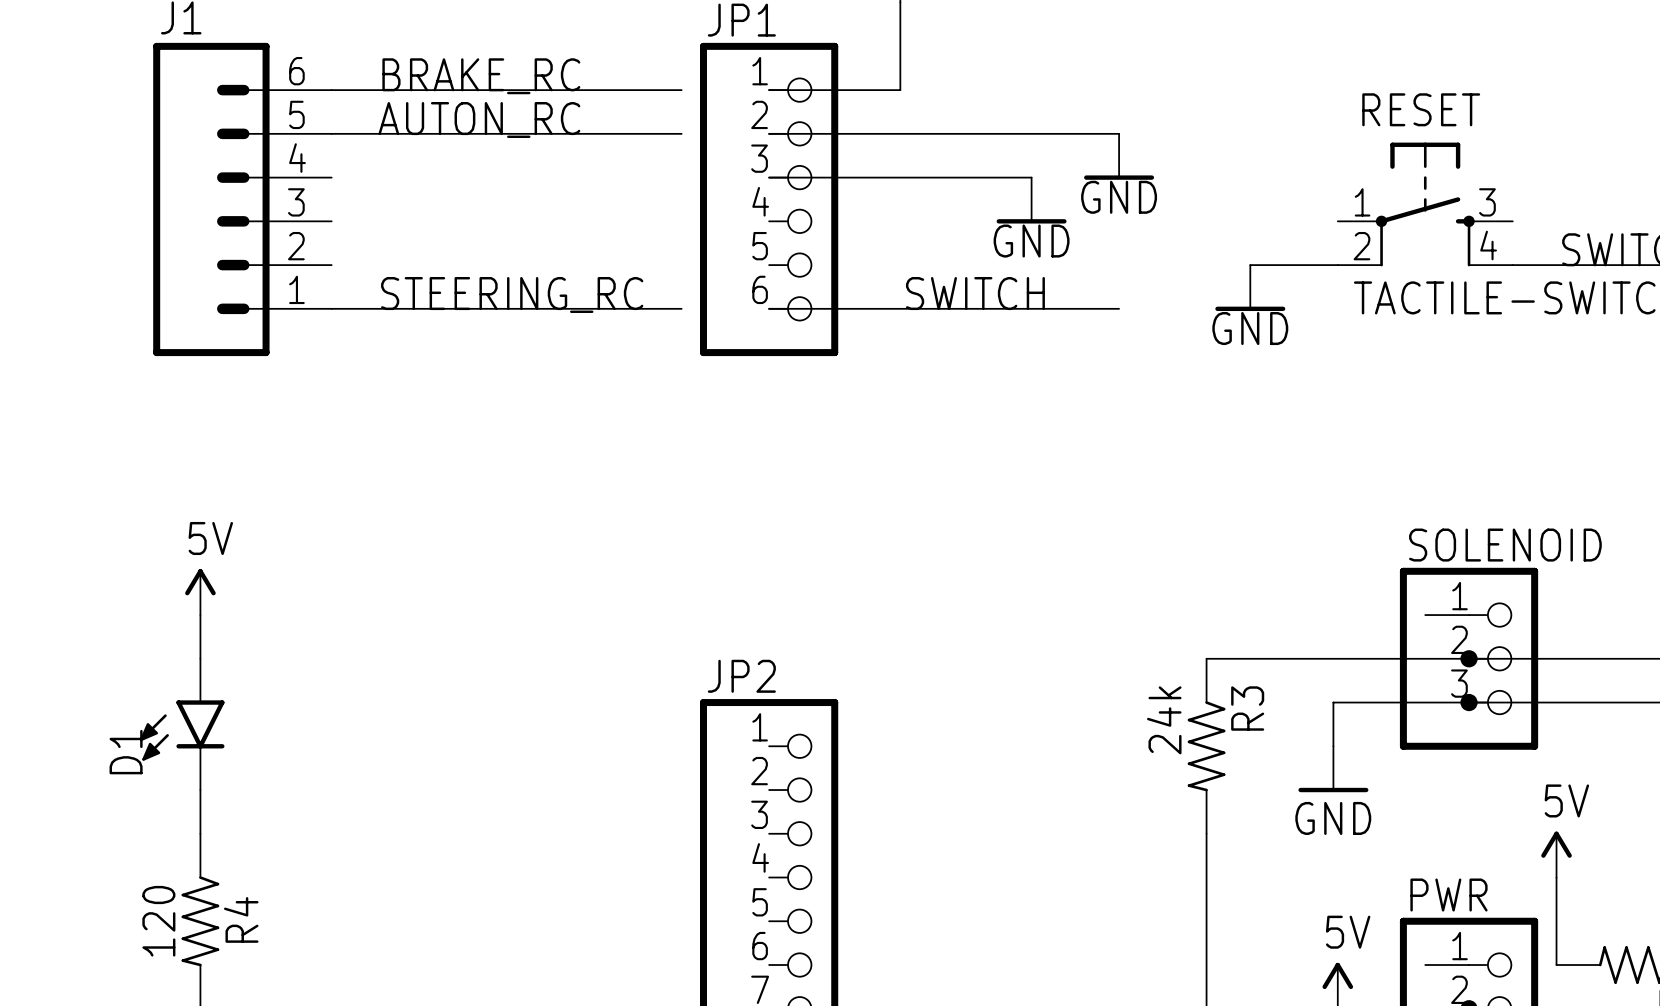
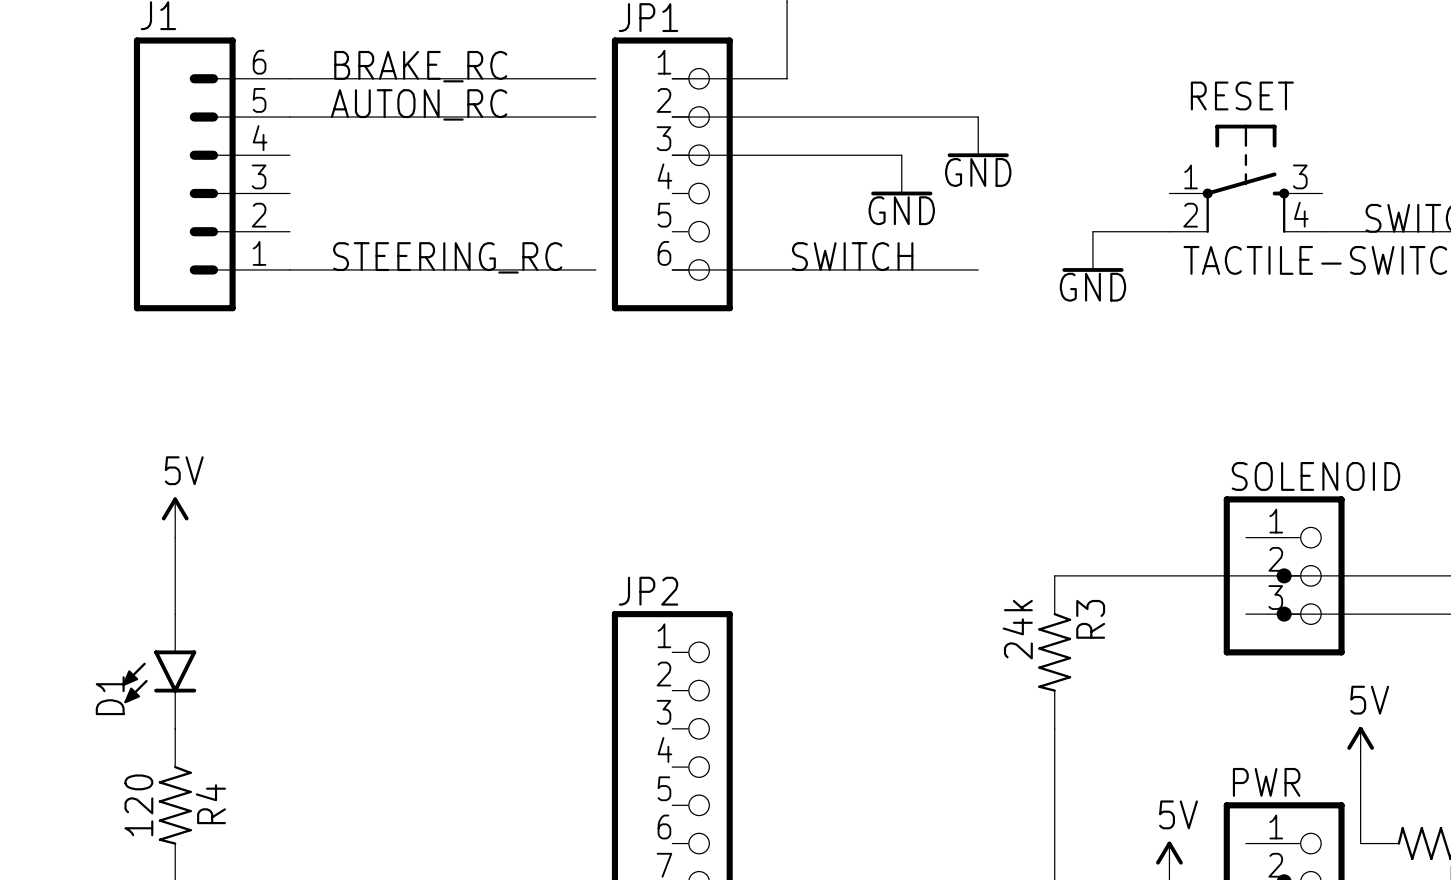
wire: (1425, 702) (1333, 702) (1333, 746) -> none
D1 position: (182, 724) -> (159, 671)
power symbol: GND (1333, 769) -> none

